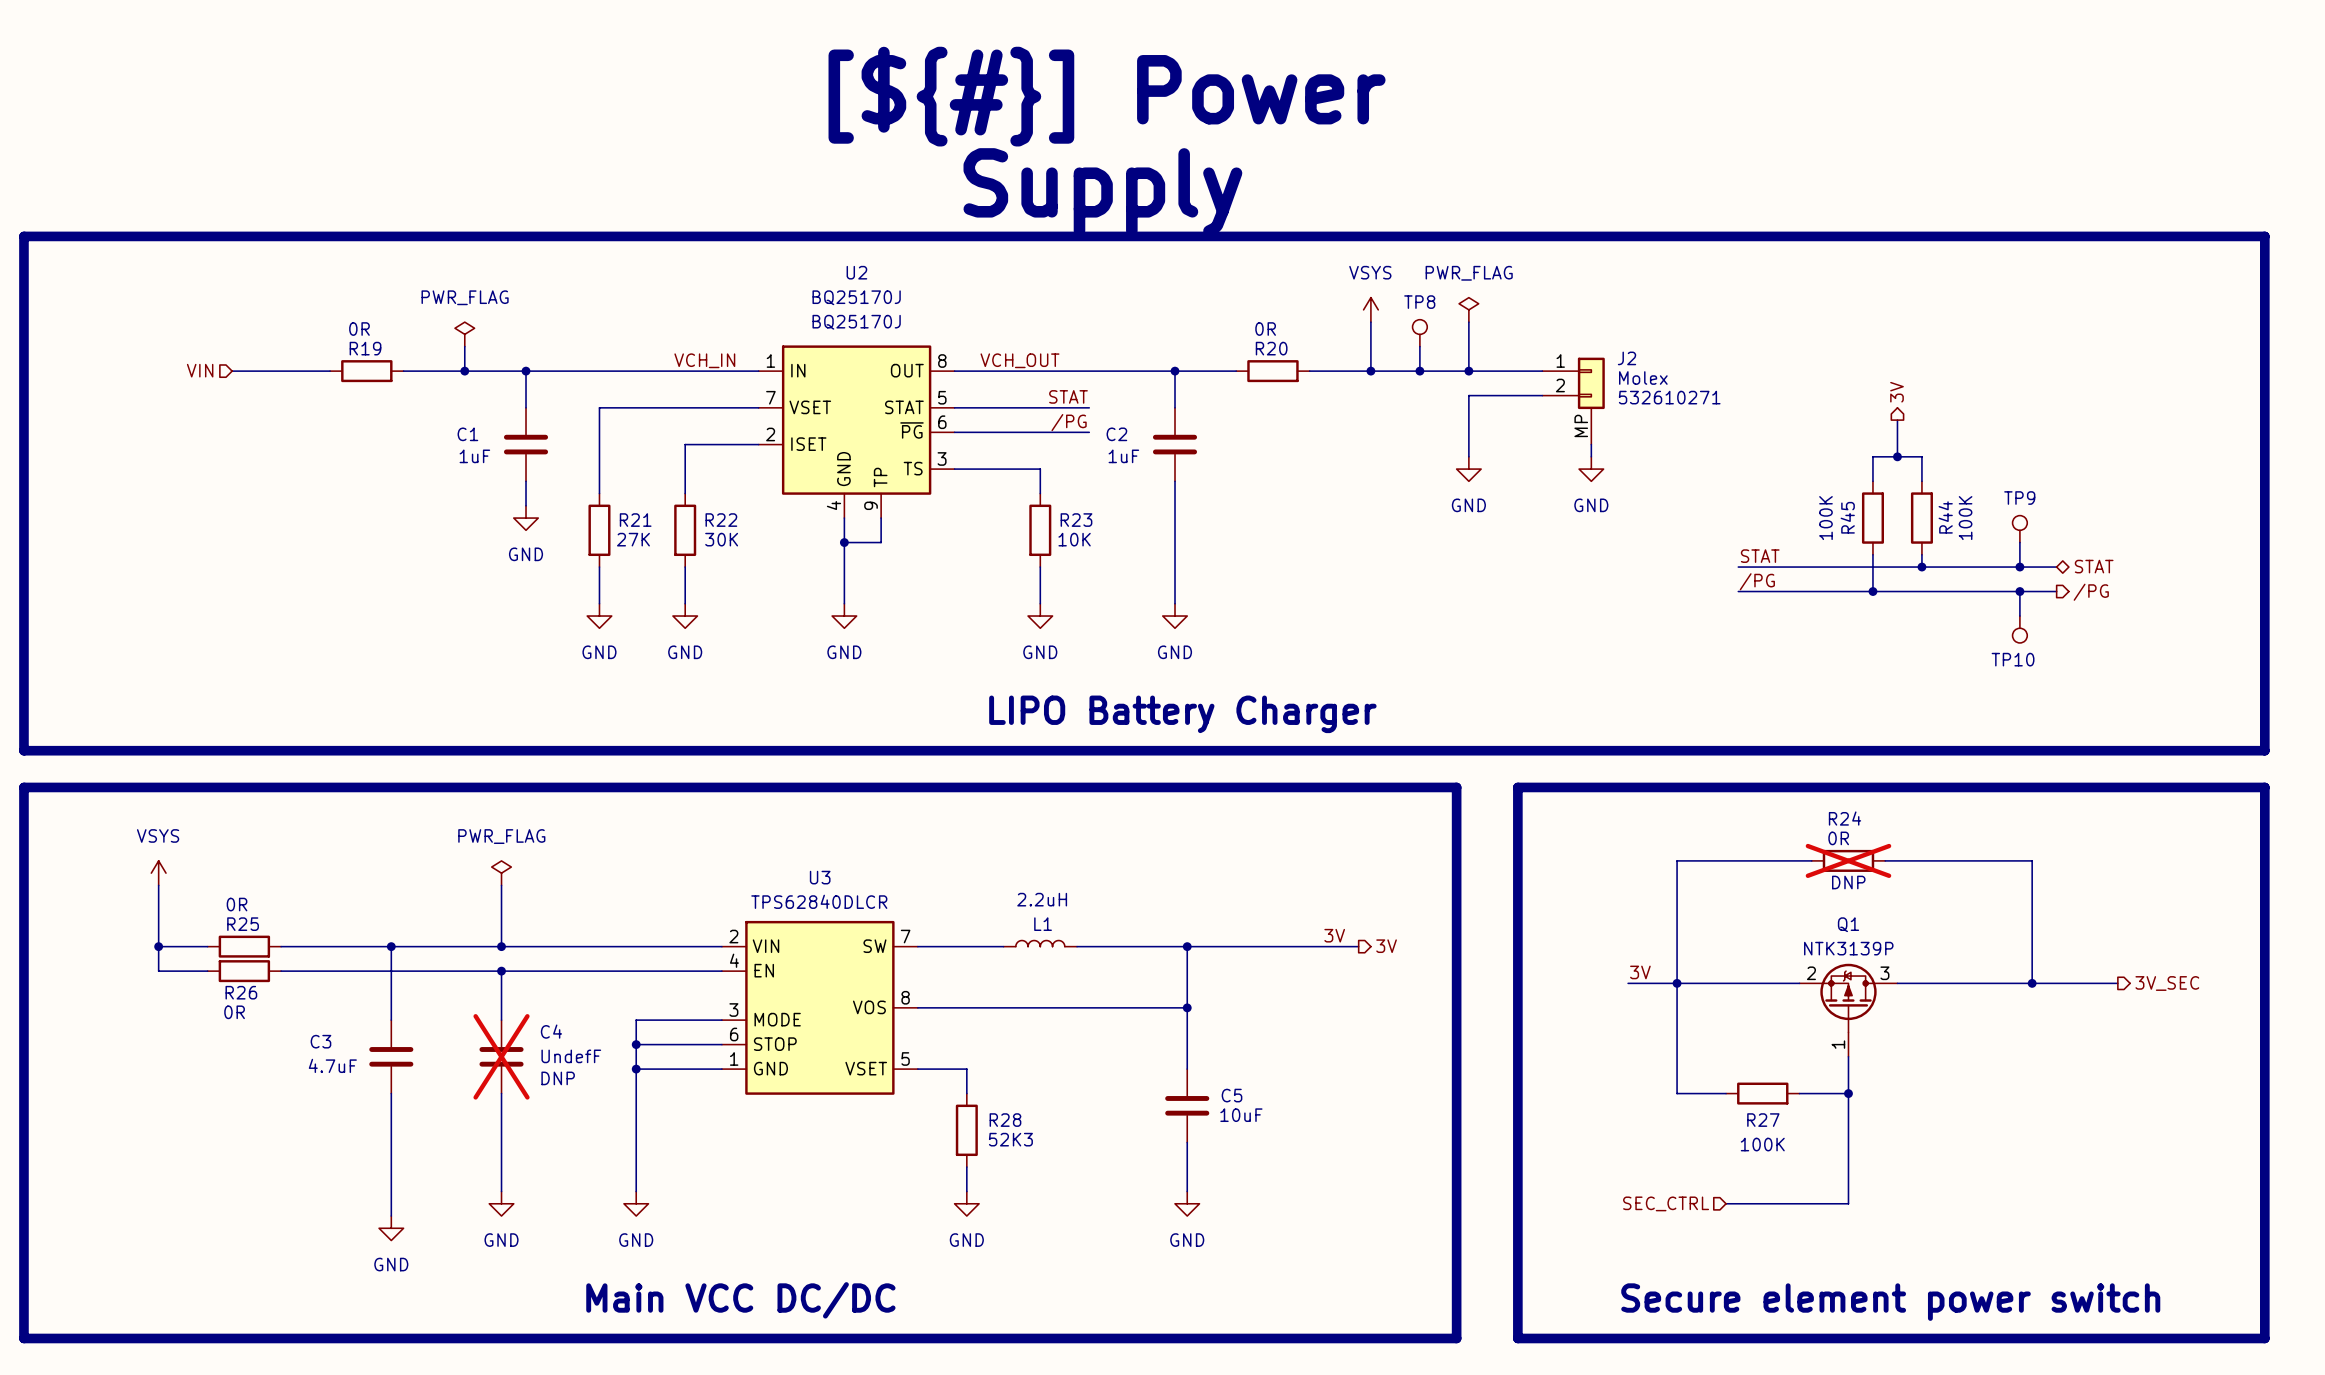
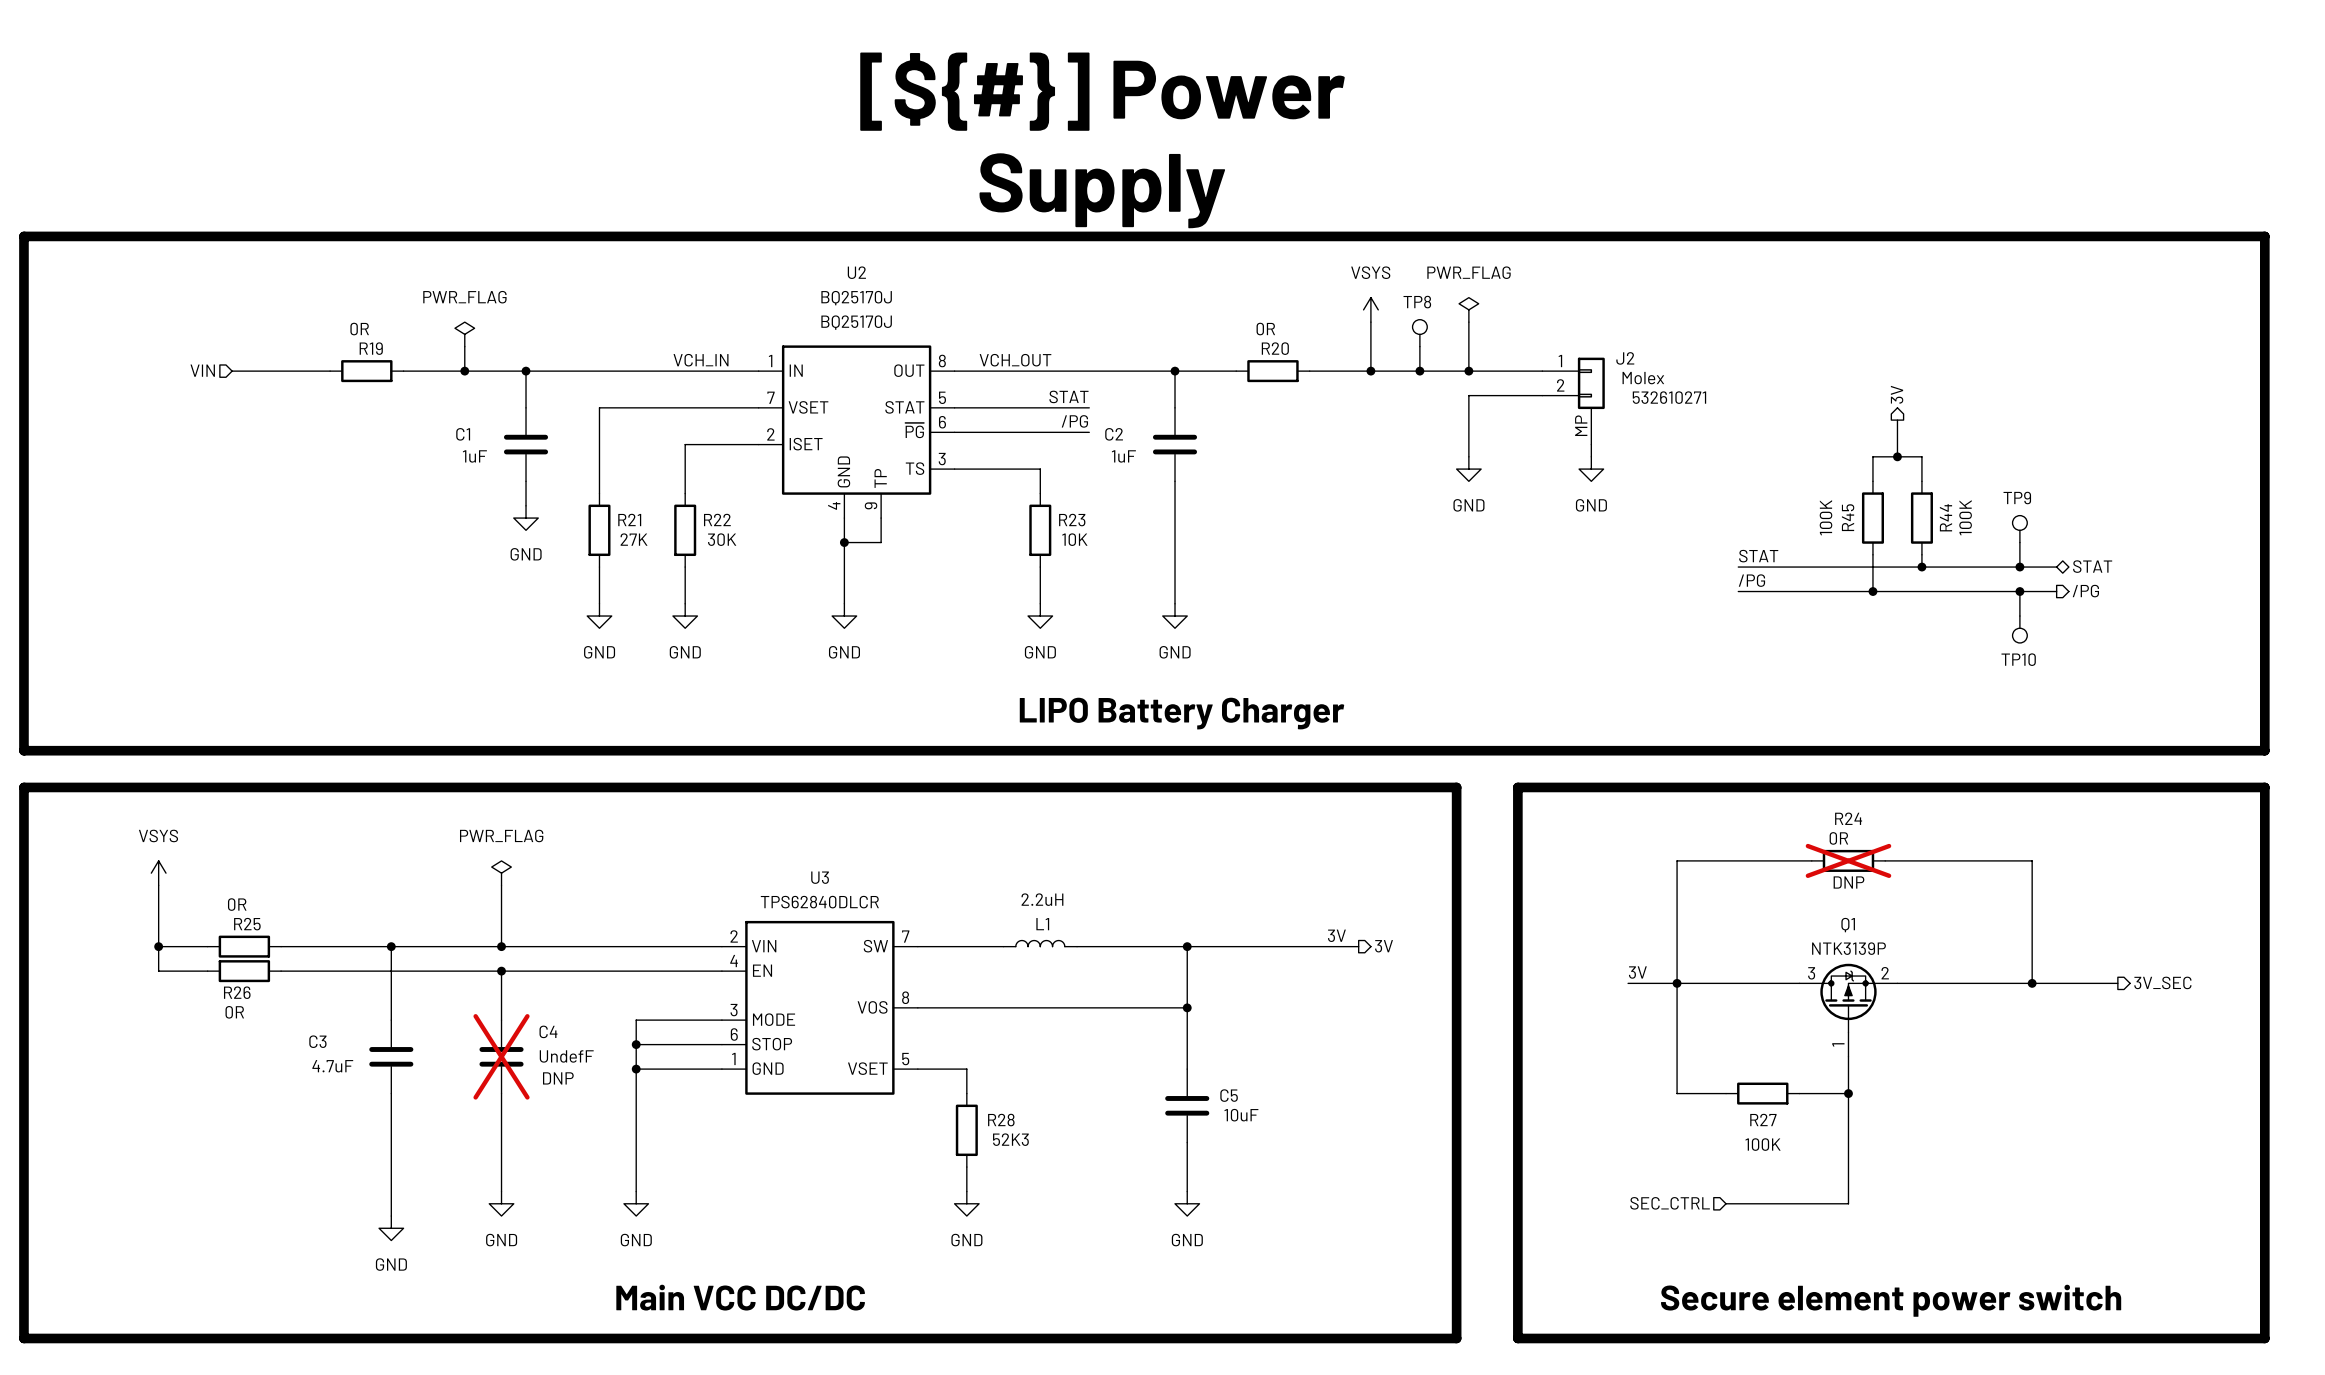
Q1 flip: as is (1848, 998) -> left-right (1848, 998)

